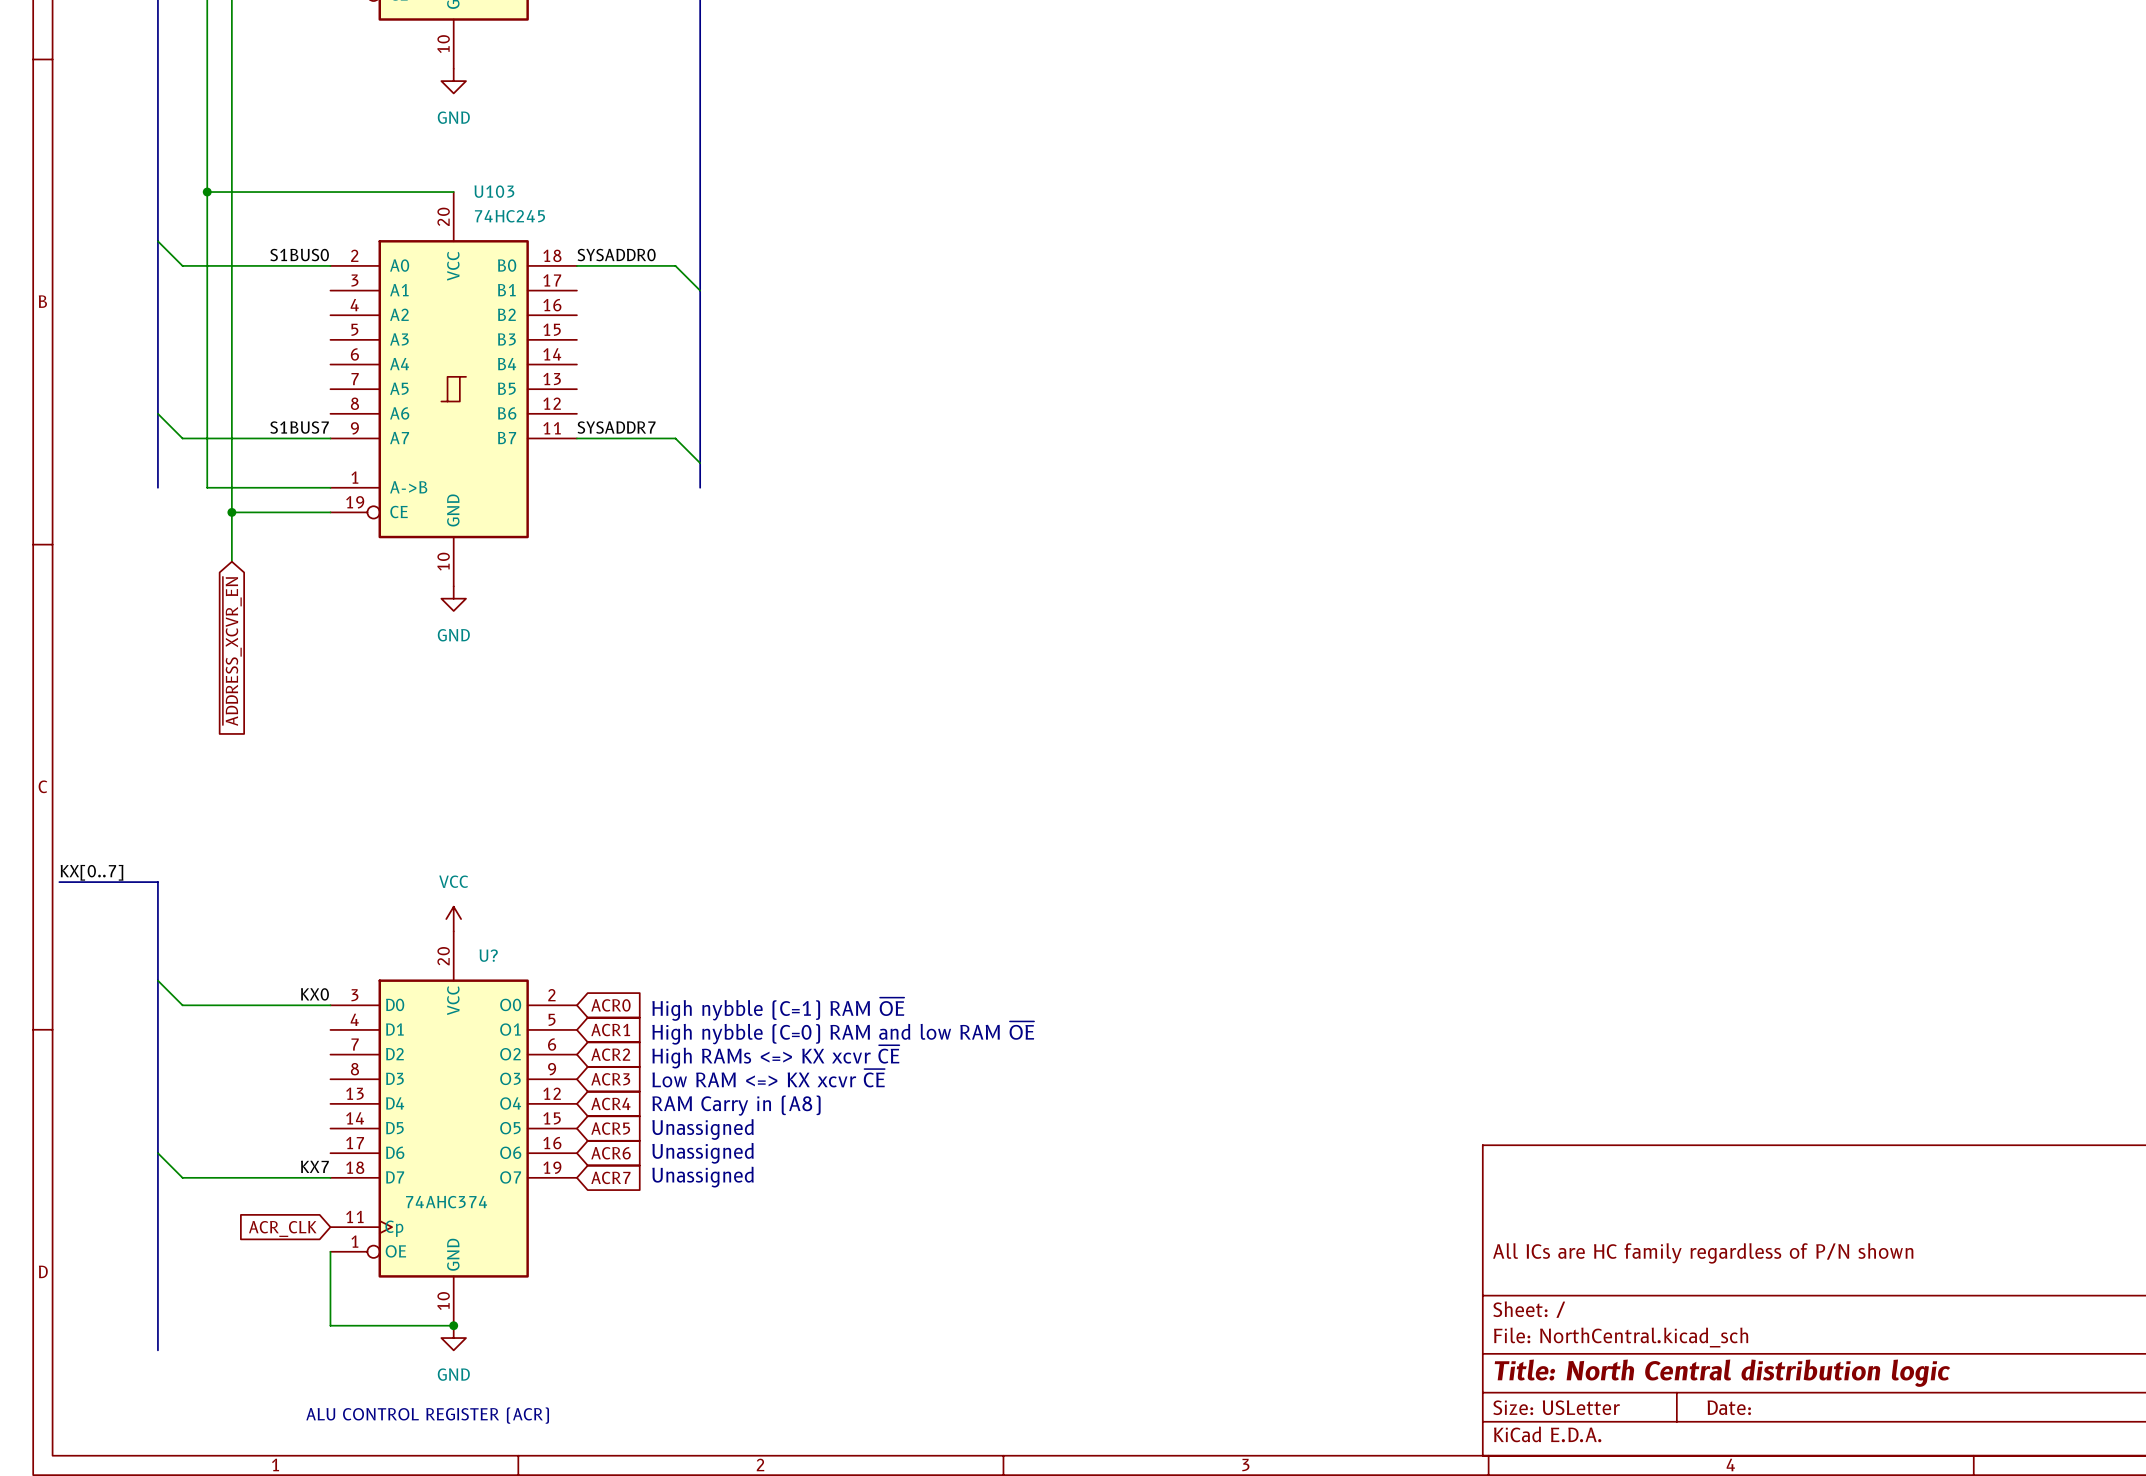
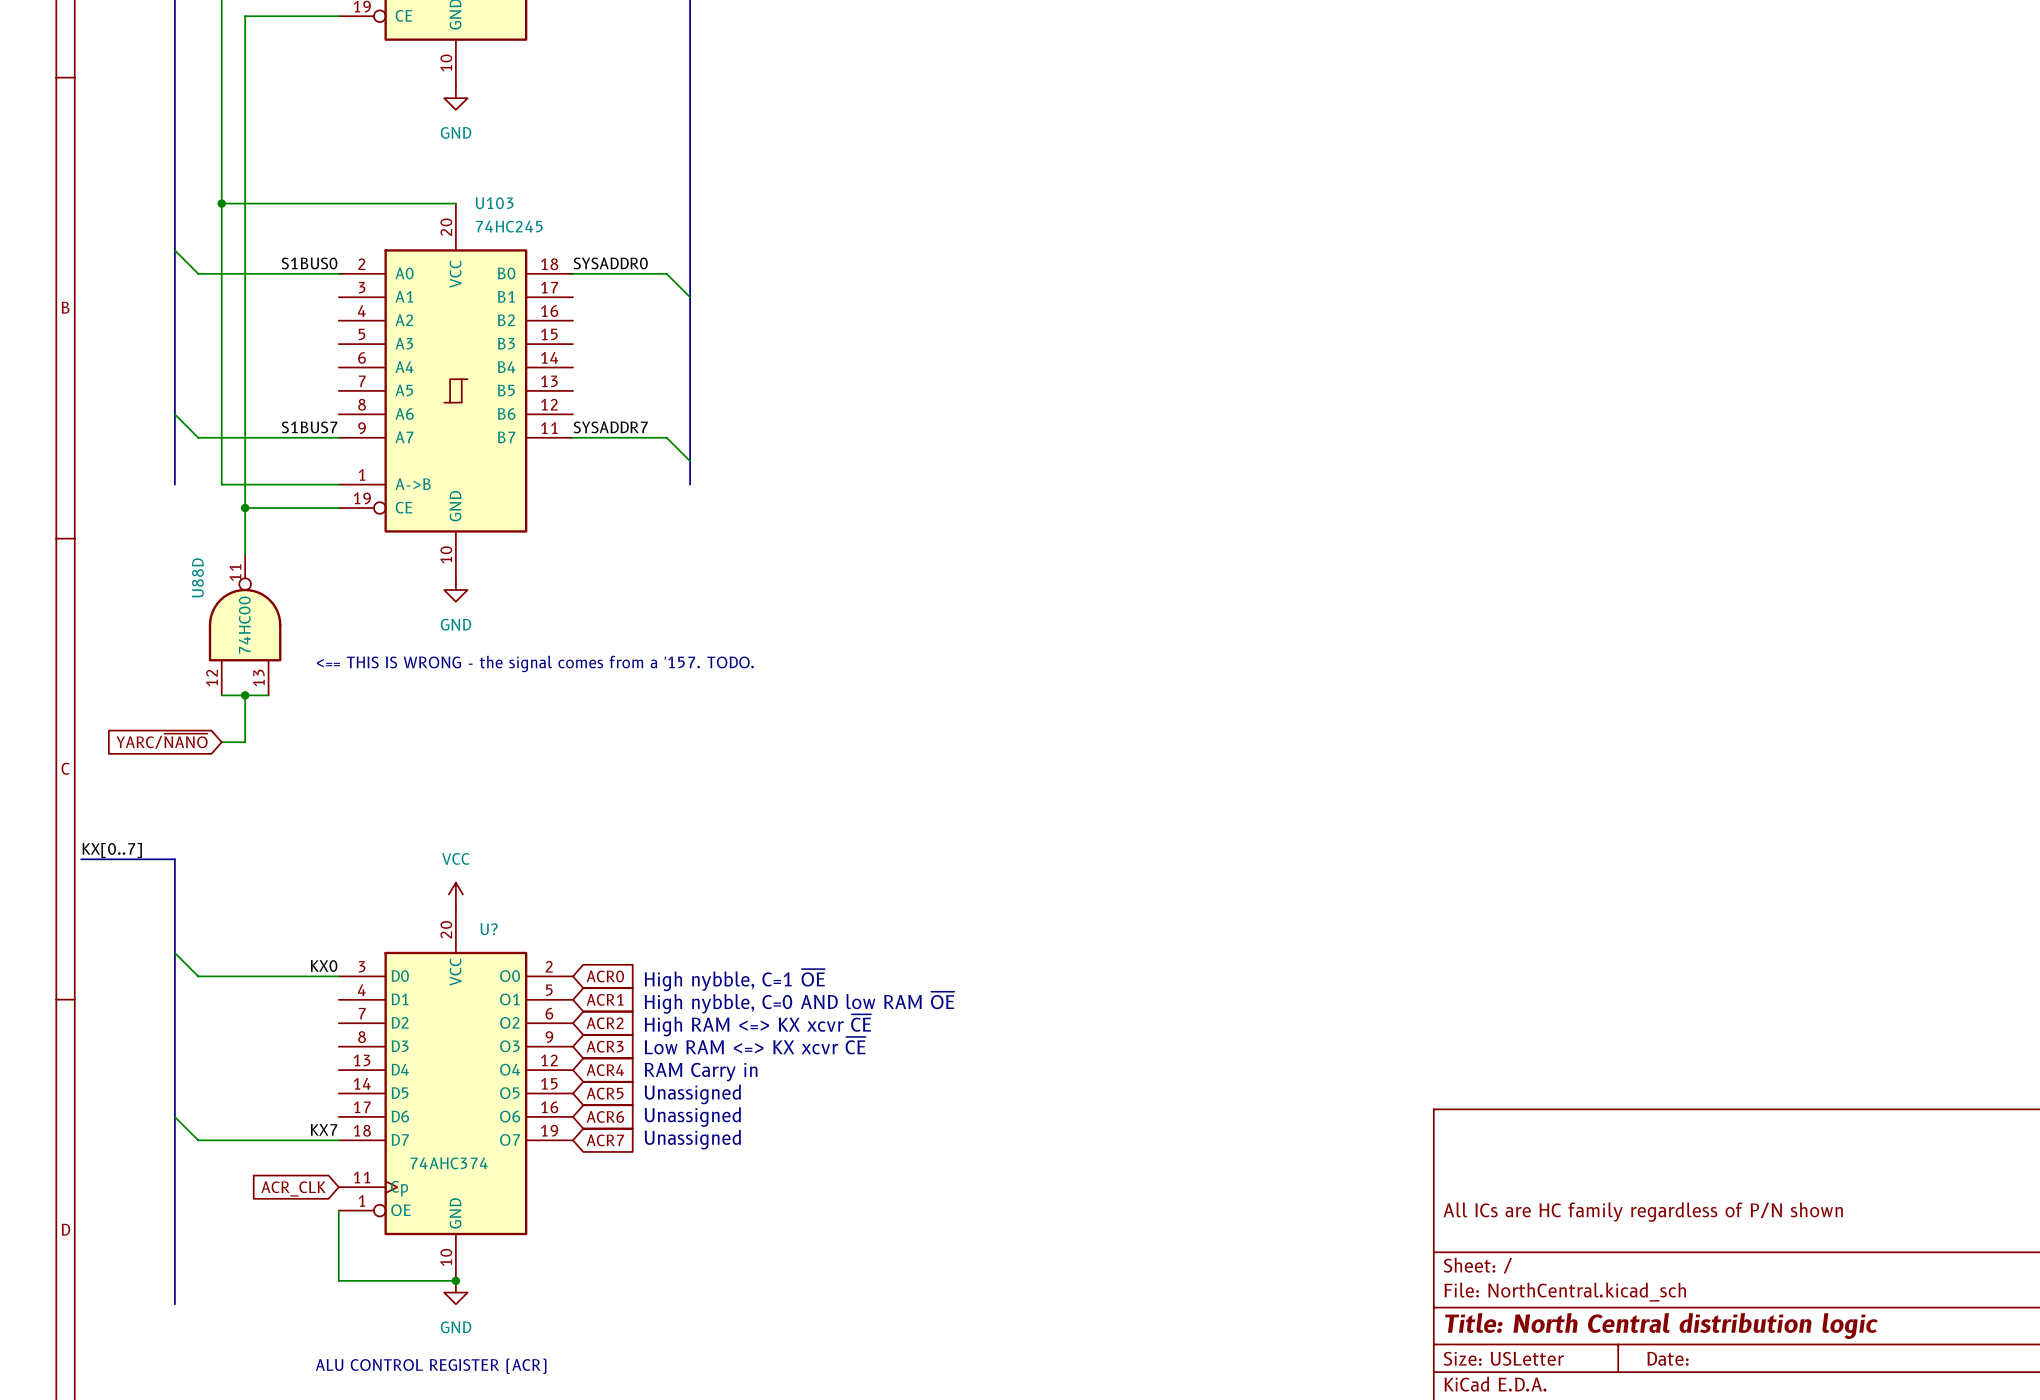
U88D: none -> 74HC00 (245, 625)
global label: ~{ADDRESS_XCVR_EN} (232, 651) -> none
text: none -> <== THIS IS WRONG - the signal comes from a '157. TODO. (535, 663)
wire: none -> (221, 695) (268, 695)
wire: none -> (245, 695) (245, 742) (221, 742)
junction: none -> (245, 695)
global label: none -> YARC/~{NANO} (162, 741)
text: High nybble (C=1) RAM ~{OE} (778, 1009) -> High nybble, C=1 ~{OE} (734, 980)
text: High nybble (C=0) RAM and low RAM ~{OE} (843, 1033) -> High nybble, C=0 AND low RAM ~{OE} (799, 1002)
text: High RAMs <=> KX xcvr ~{CE} (775, 1056) -> High RAM <=> KX xcvr ~{CE} (757, 1025)
text: RAM Carry in (A8) (736, 1105) -> RAM Carry in (701, 1072)

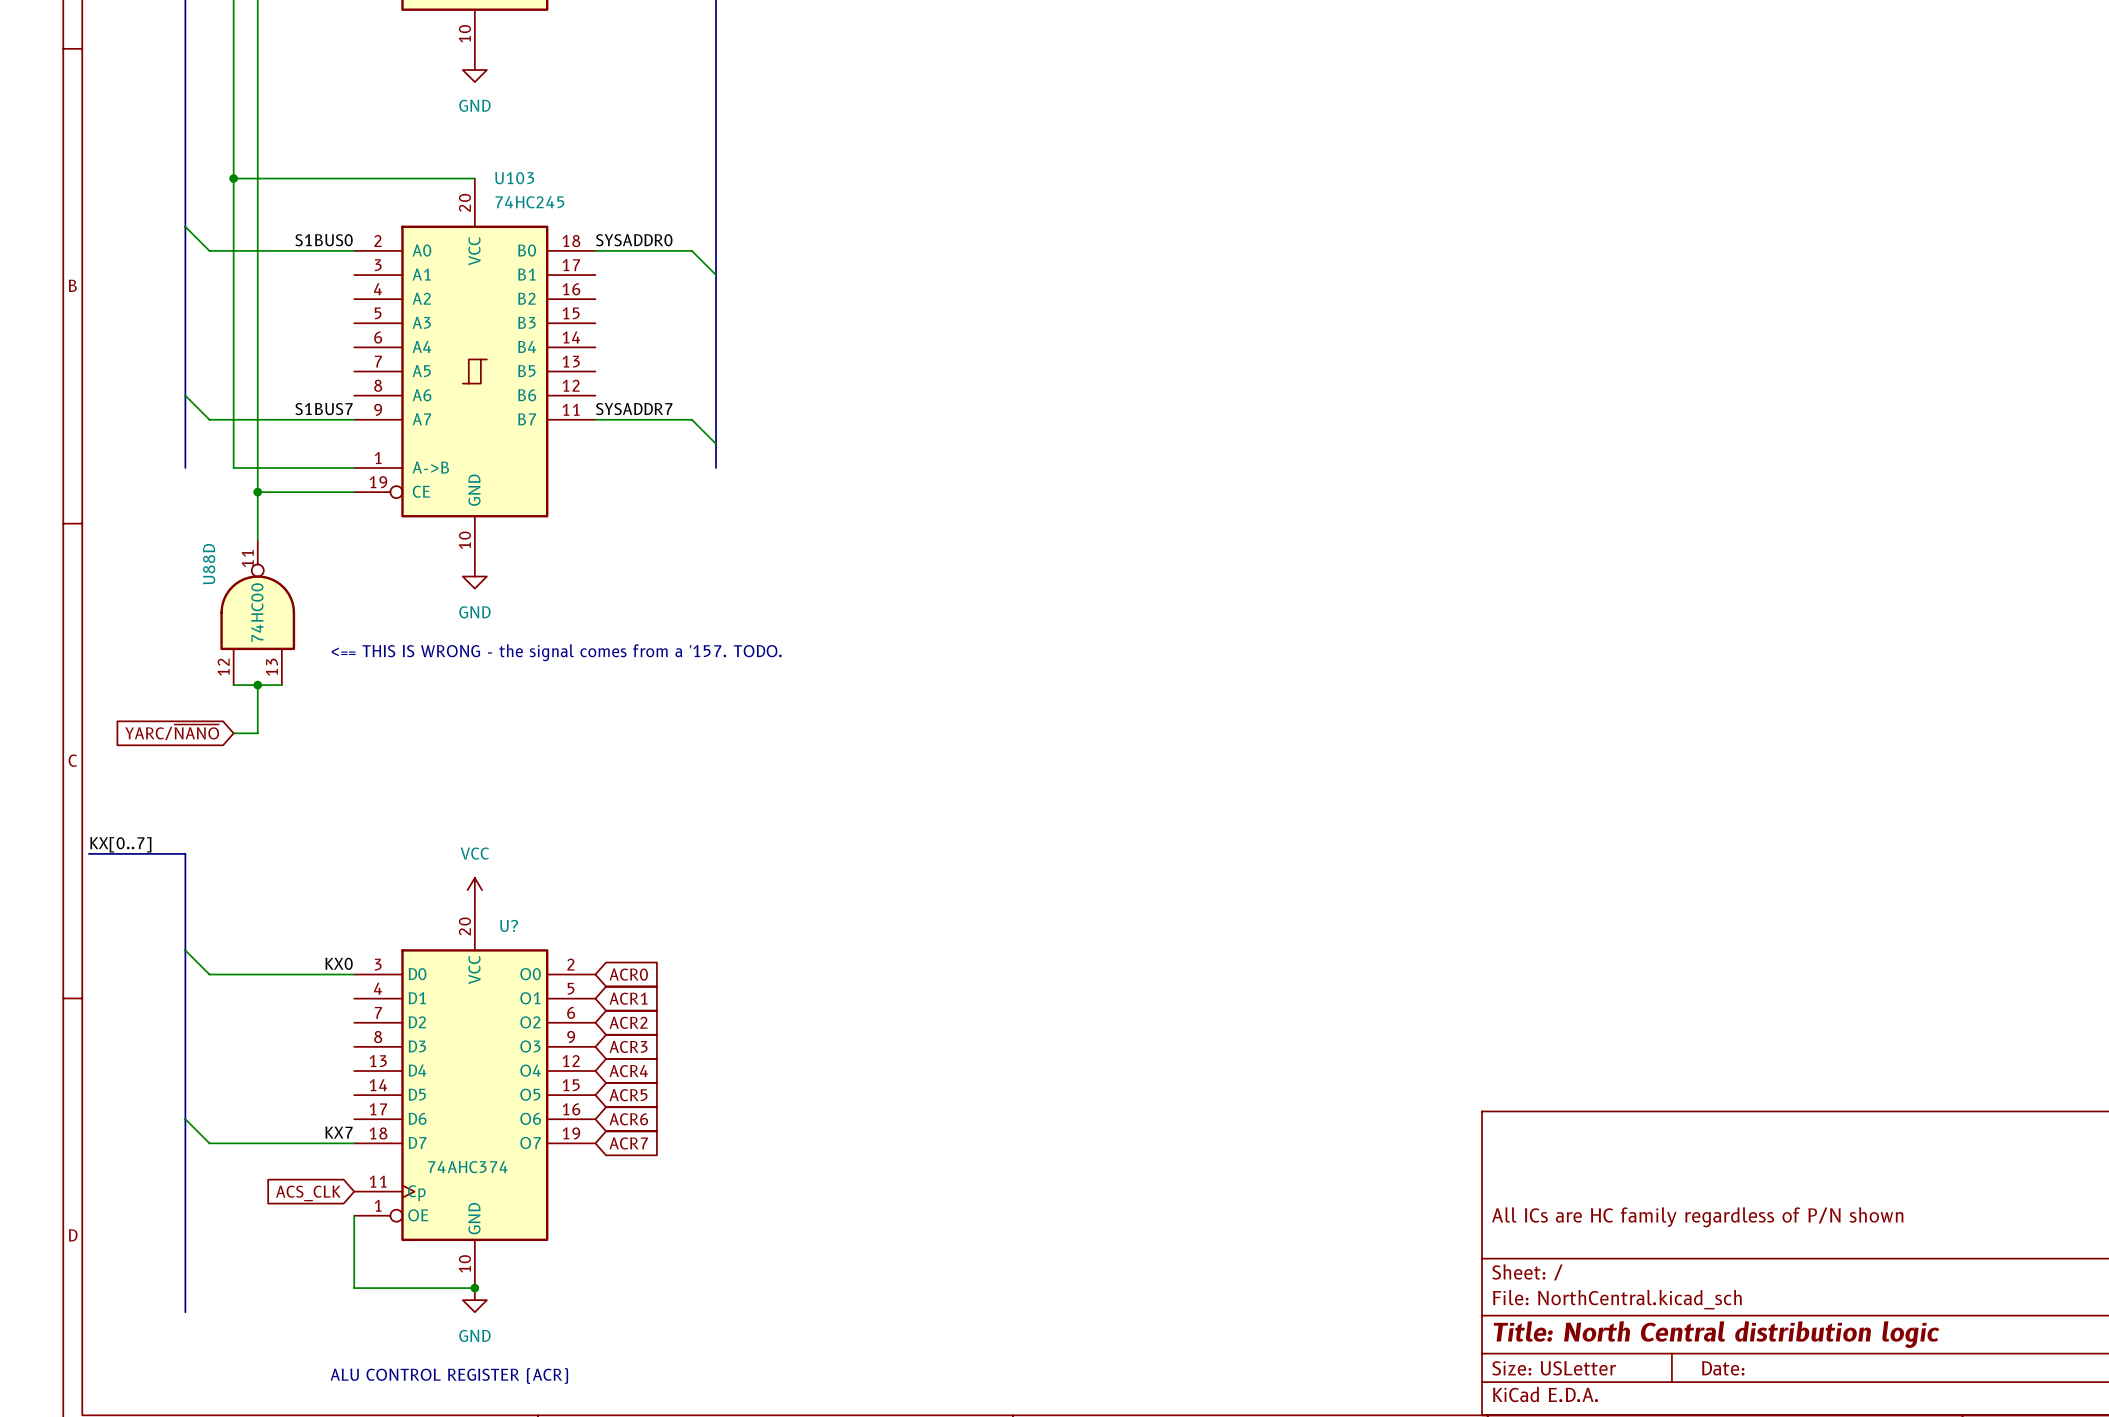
text: High nybble, C=1 ~{OE} (734, 980) -> none
text: High nybble, C=0 AND low RAM ~{OE} (799, 1002) -> none
text: High RAM <=> KX xcvr ~{CE} (757, 1025) -> none
text: Low RAM <=> KX xcvr ~{CE} (755, 1045) -> none
text: RAM Carry in (701, 1072) -> none
text: Unassigned (692, 1094) -> none
text: Unassigned (692, 1117) -> none
text: Unassigned (692, 1139) -> none
global label: ACR_CLK (293, 1188) -> ACS_CLK (308, 1193)

